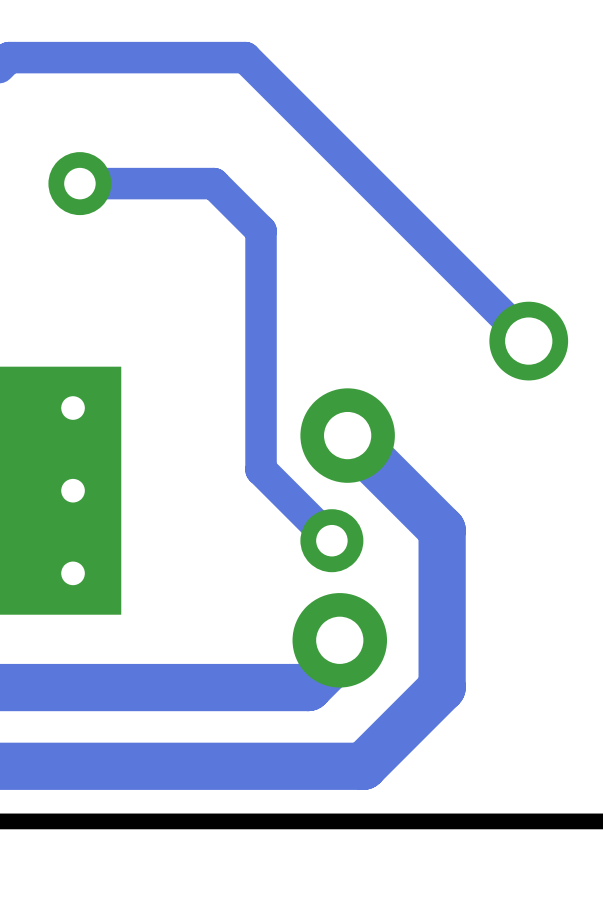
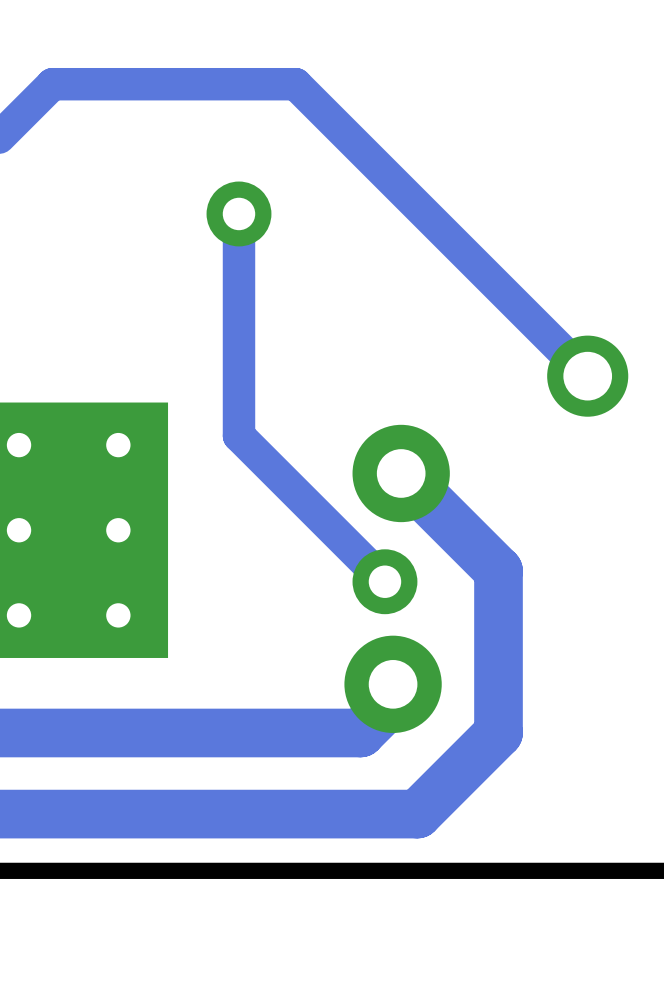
track: (79, 183) (213, 183) (261, 230) (261, 469) -> (238, 213) (238, 435) (311, 508)
via position: (79, 183) -> (238, 213)

